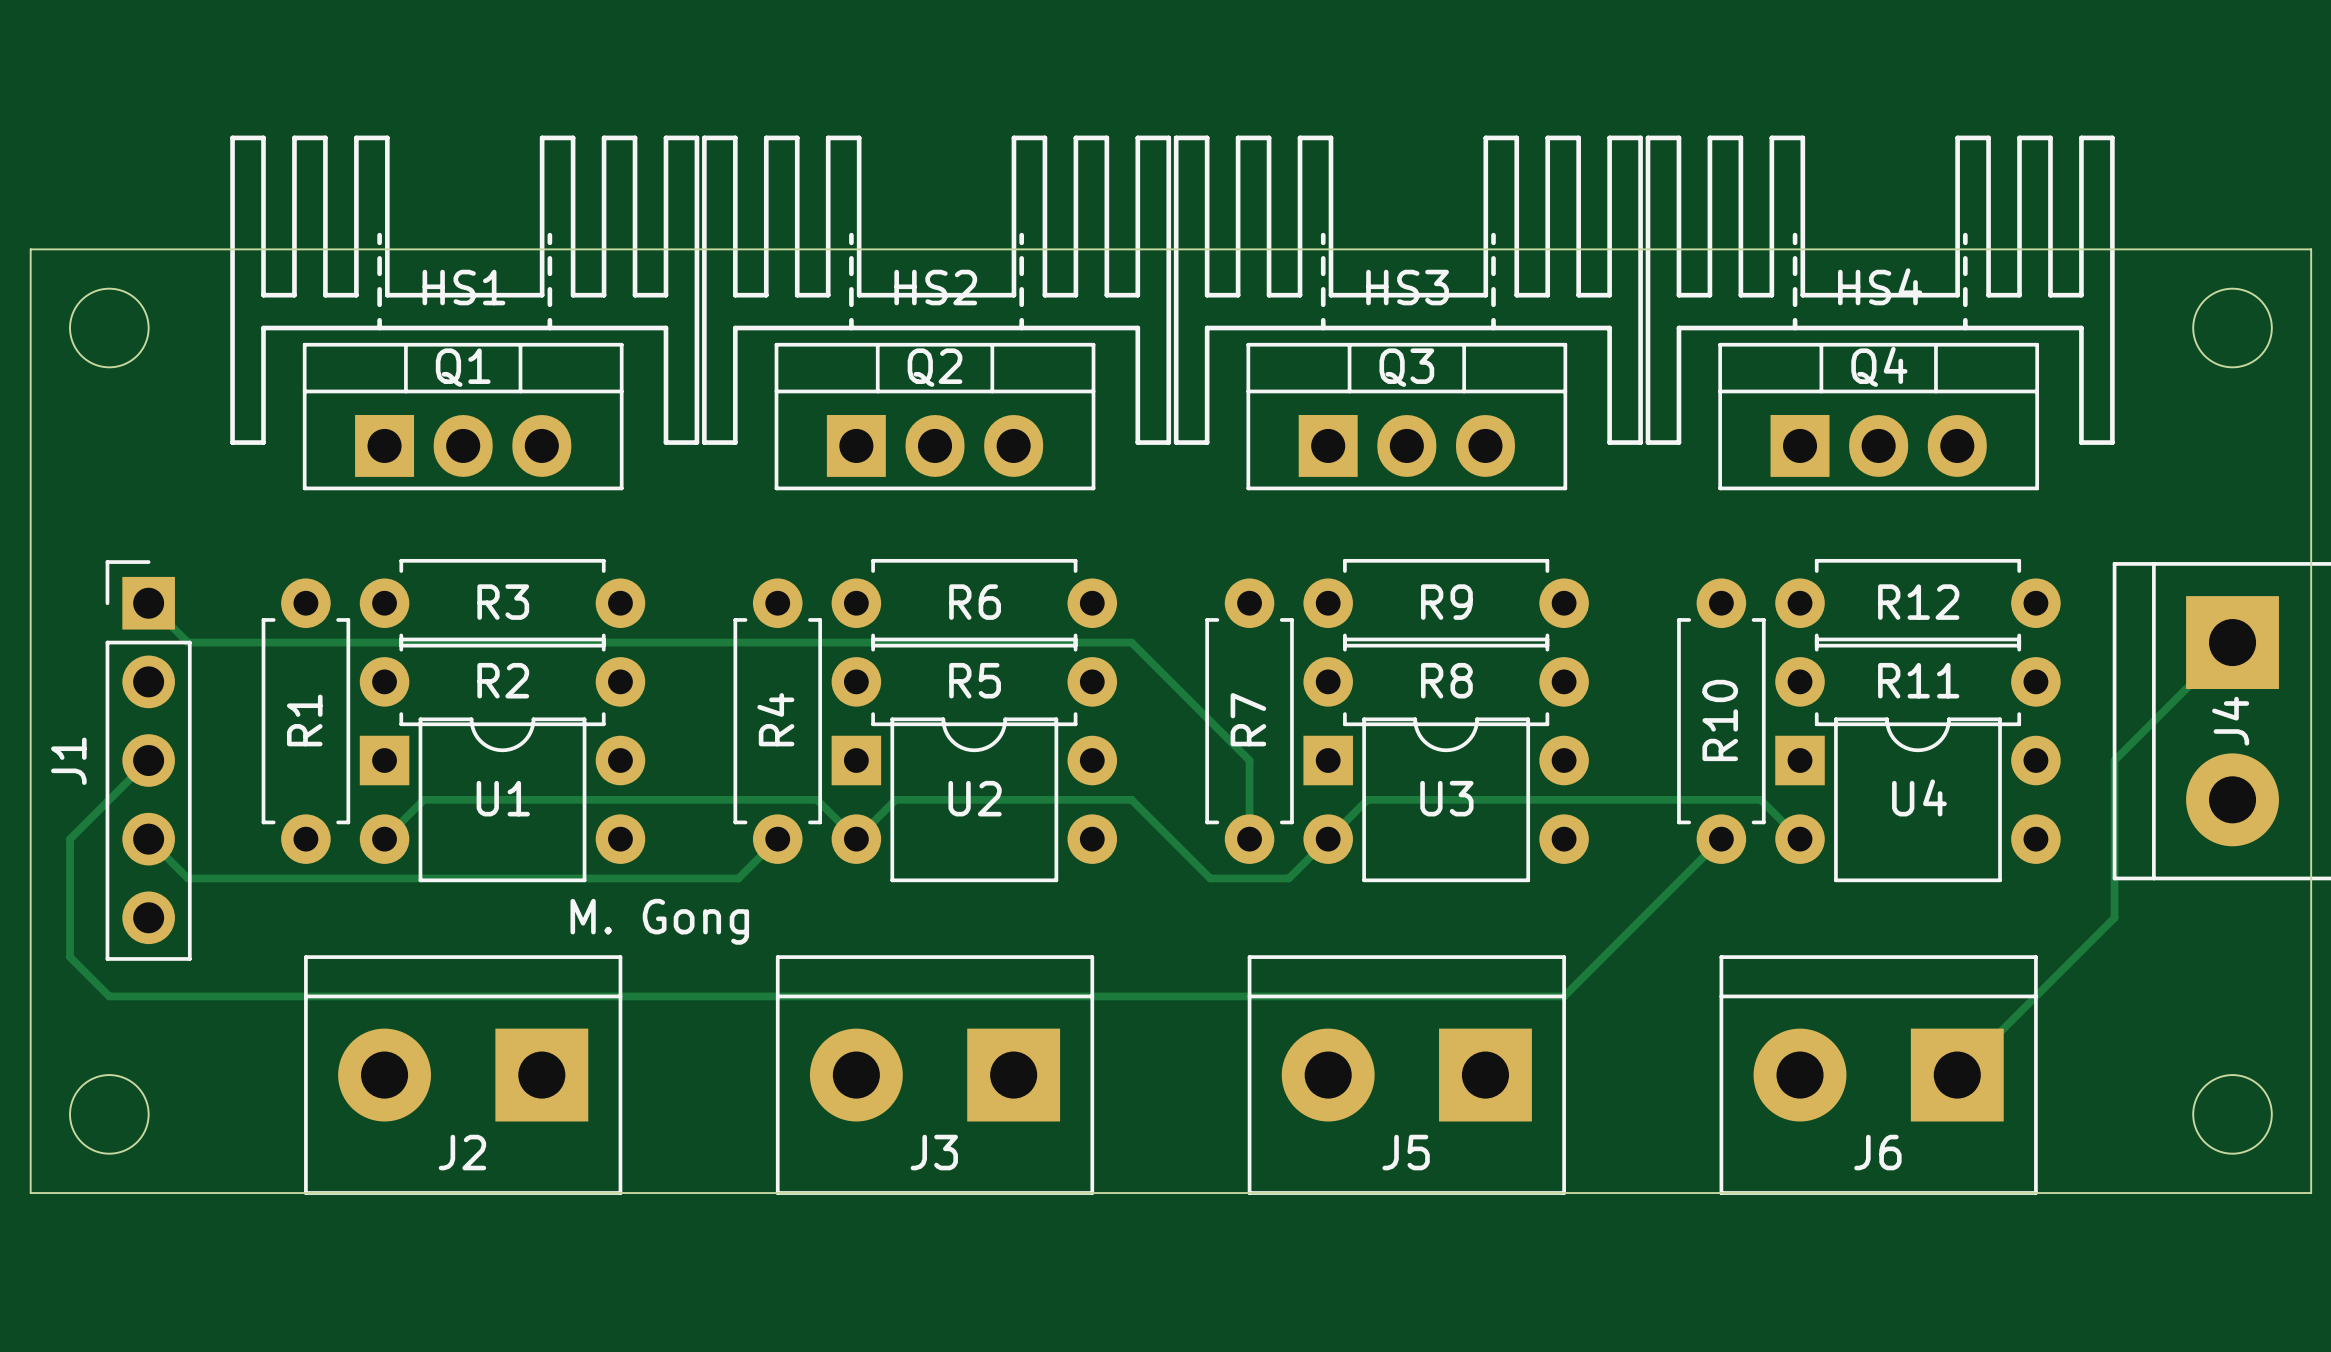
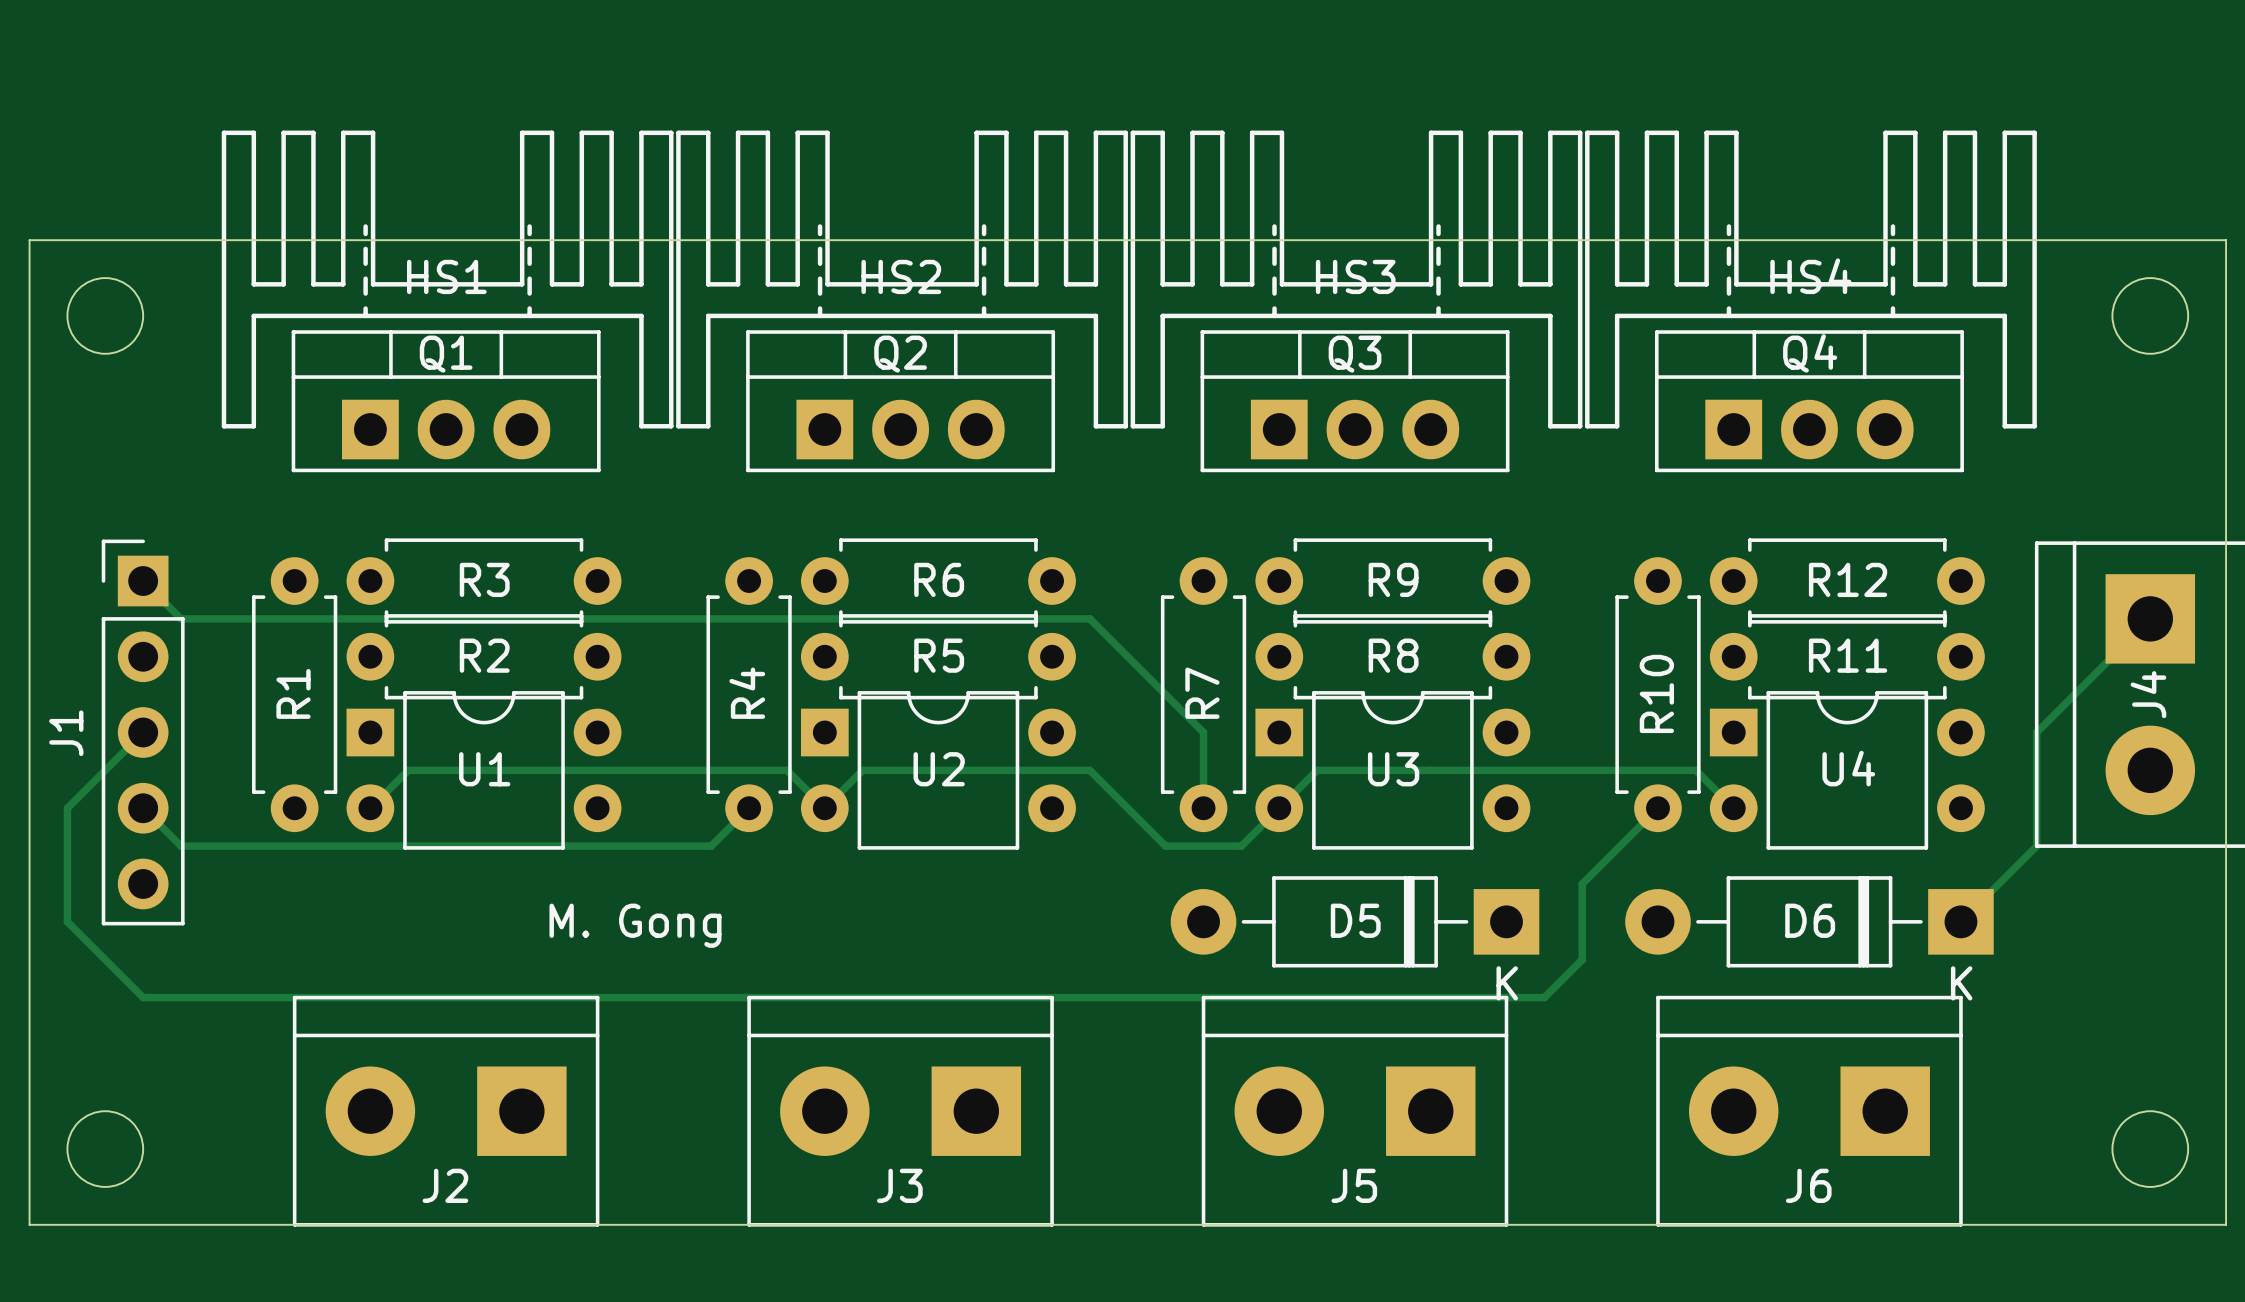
track: (2114, 878) (2114, 917) (1957, 1075) -> (2036, 846) (1960, 921)
track: (1642, 917) (1564, 996) (109, 996) -> (1582, 883) (1582, 959) (1544, 997) (143, 997) (105, 959)
text position: M. Gong (659, 921) -> M. Gong (635, 925)
D5: none -> (1355, 921)
D6: none -> (1809, 921)
J2 position: (463, 1075) -> (446, 1111)
J3 position: (935, 1075) -> (900, 1111)
J5 position: (1406, 1075) -> (1355, 1111)
J6 position: (1878, 1075) -> (1809, 1111)
round board edge position: (109, 1114) -> (105, 1149)
round board edge position: (2232, 1114) -> (2150, 1149)
board edge: (30, 1193) (2311, 1193) -> (29, 1149) (29, 1224) (2226, 1224) (2226, 1149)

